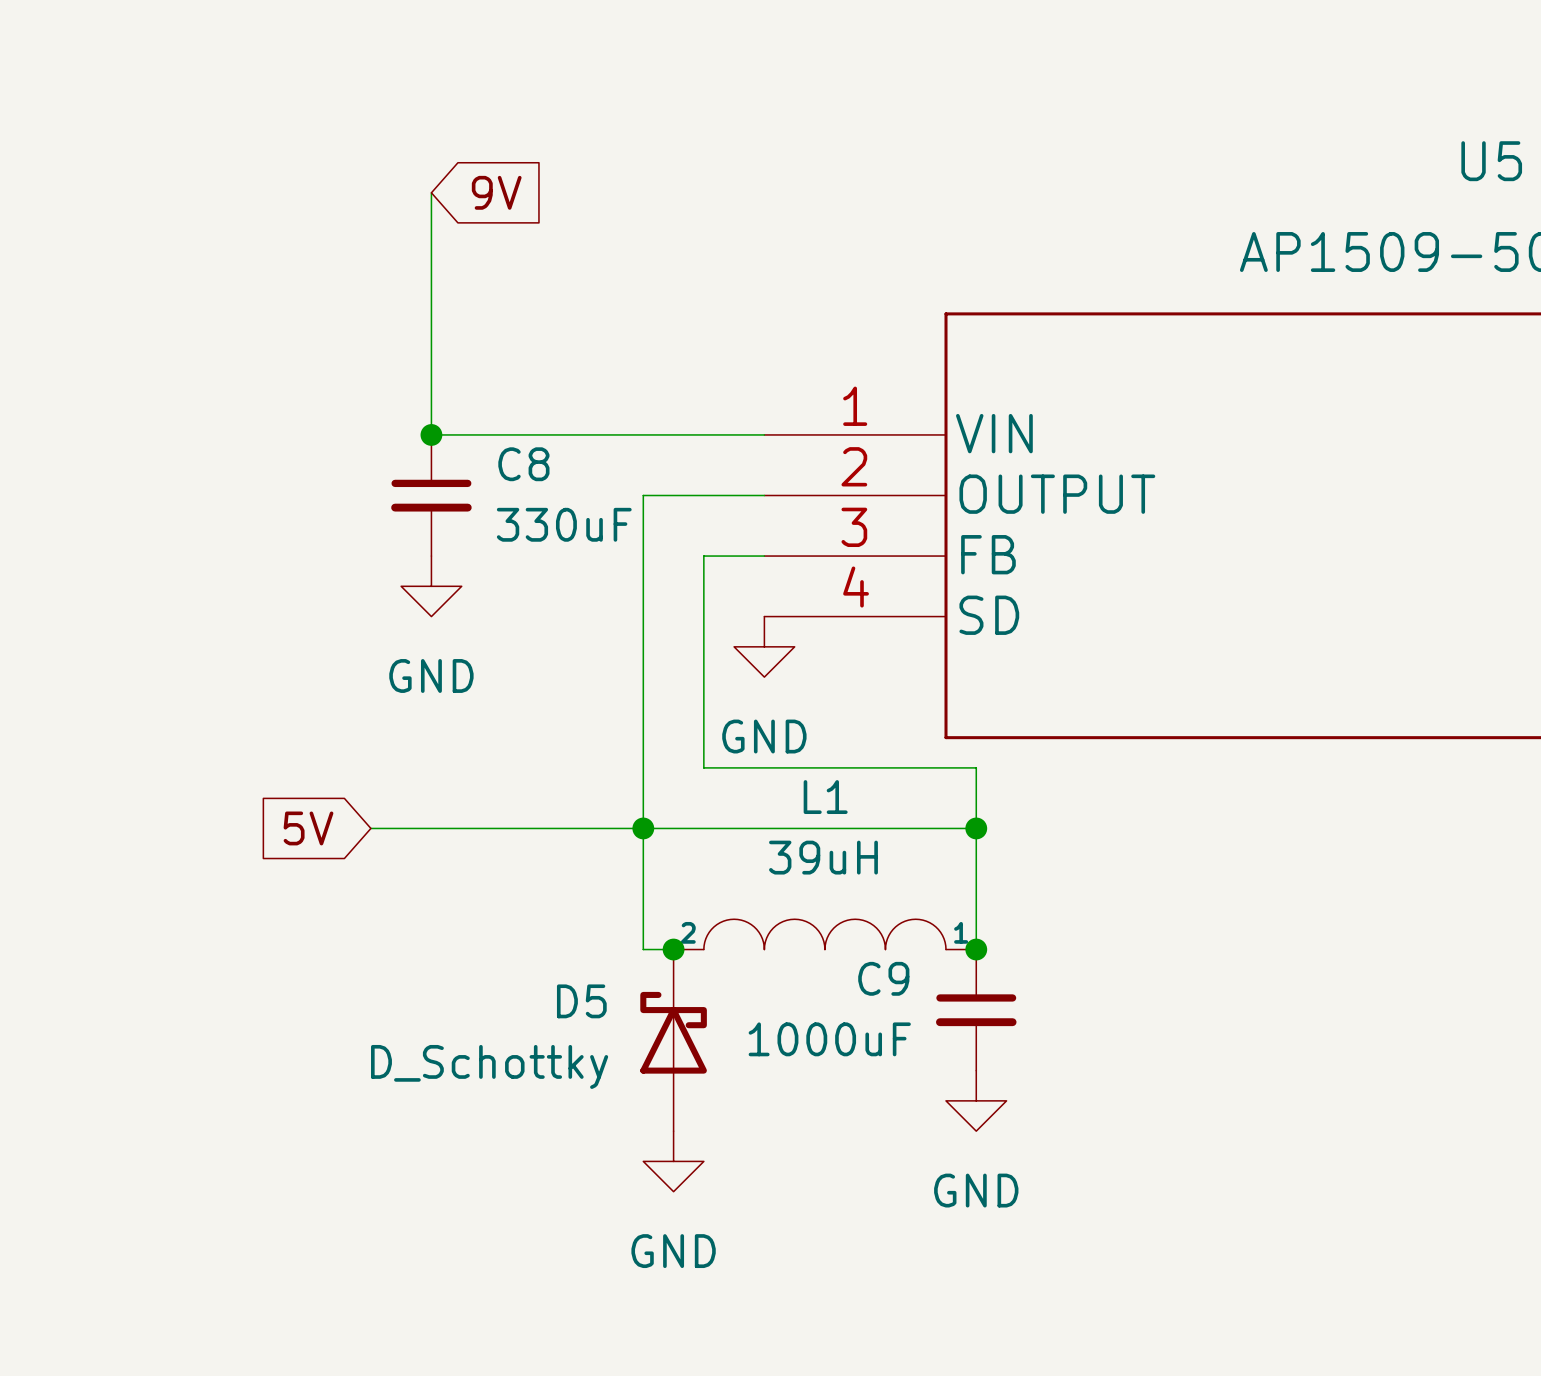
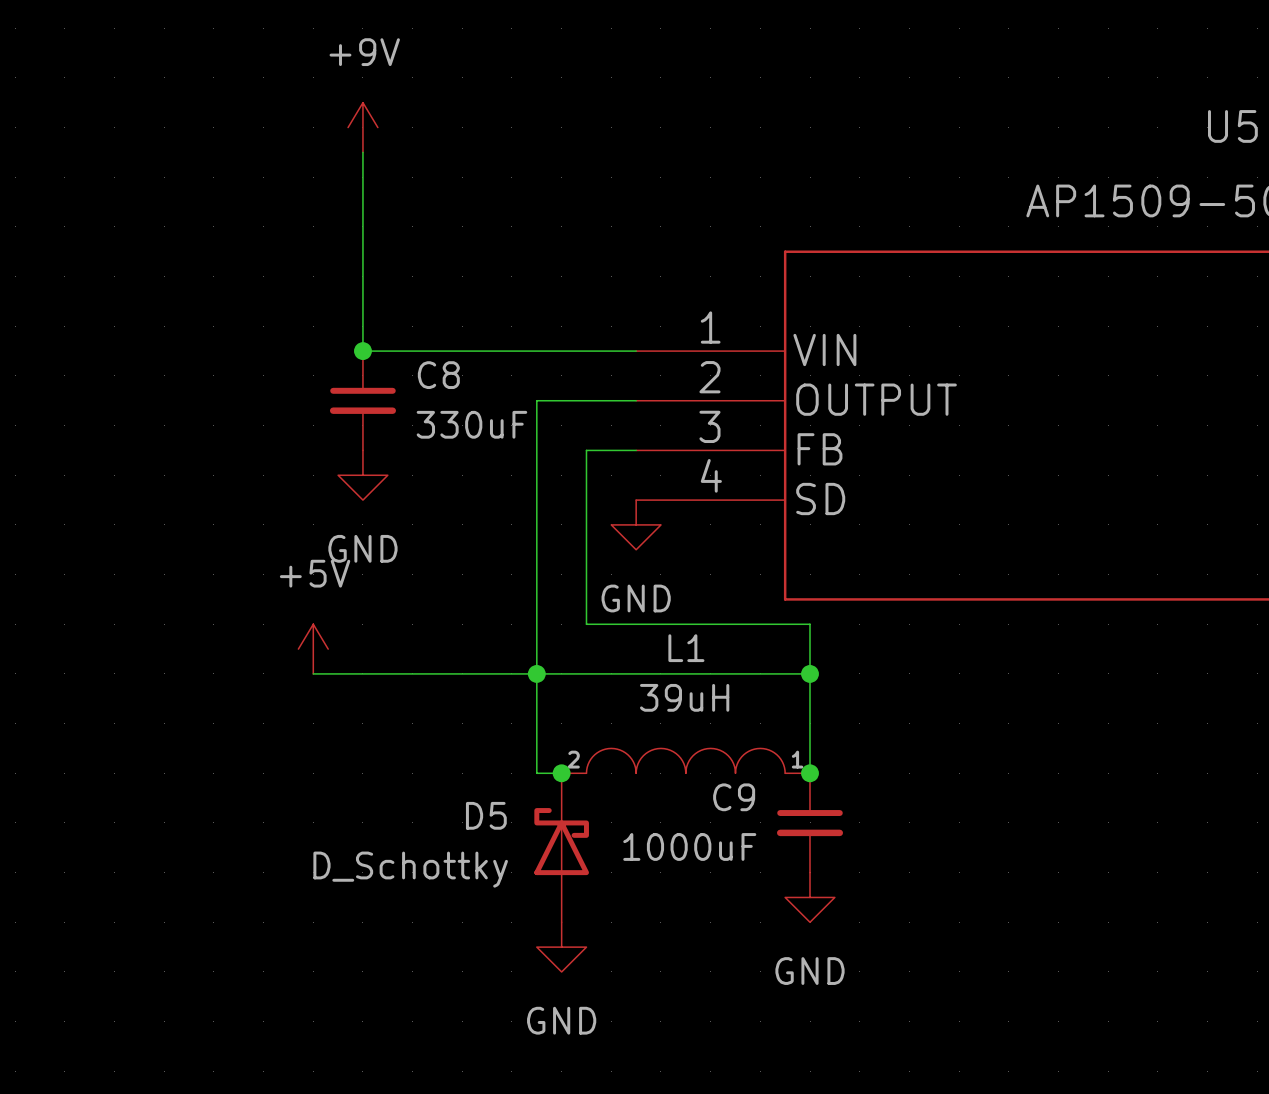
power symbol: none -> +9V (362, 127)
global label: 9V (496, 192) -> none
power symbol: none -> +5V (313, 649)
global label: 5V (308, 828) -> none

